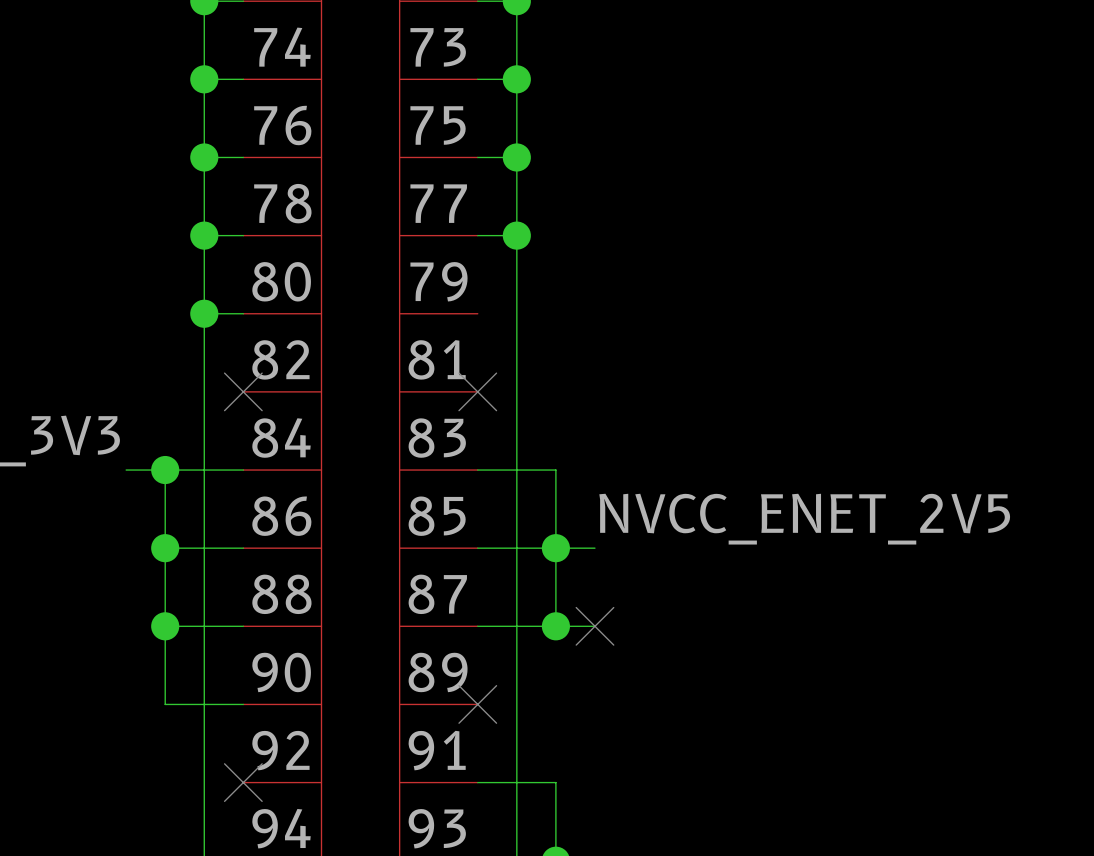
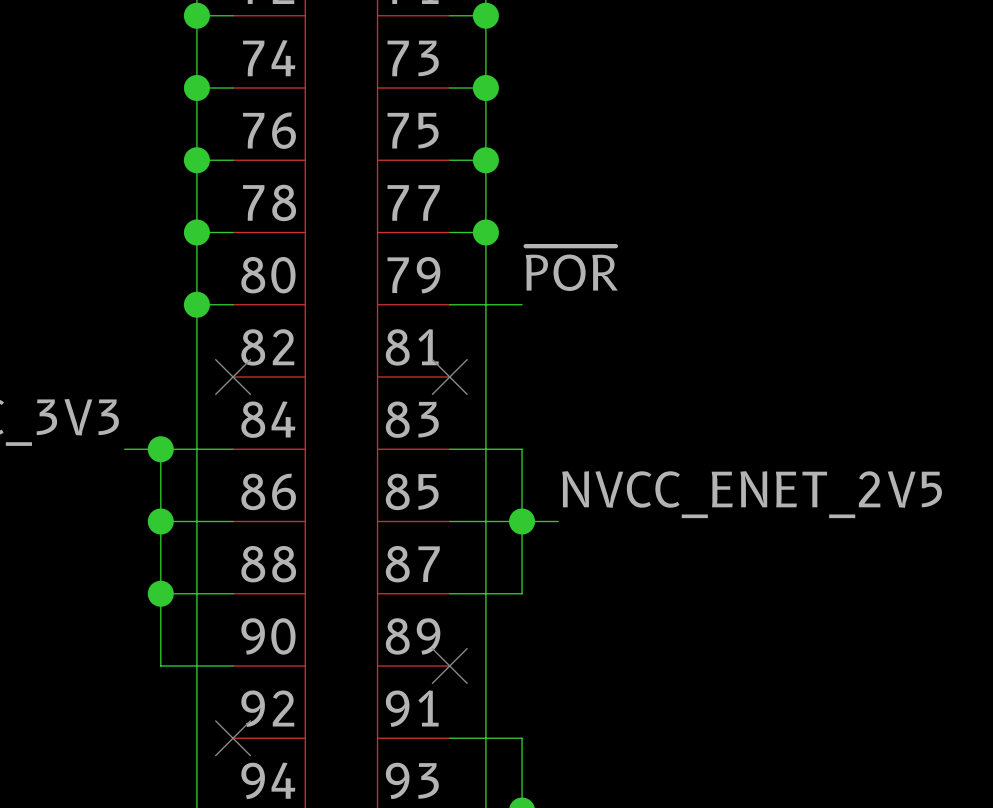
label: none -> ~{POR} (571, 268)
wire: none -> (449, 304) (522, 304)
wire: (555, 626) (594, 626) -> none
junction: (555, 626) -> none
no-connect mark: (594, 626) -> none

